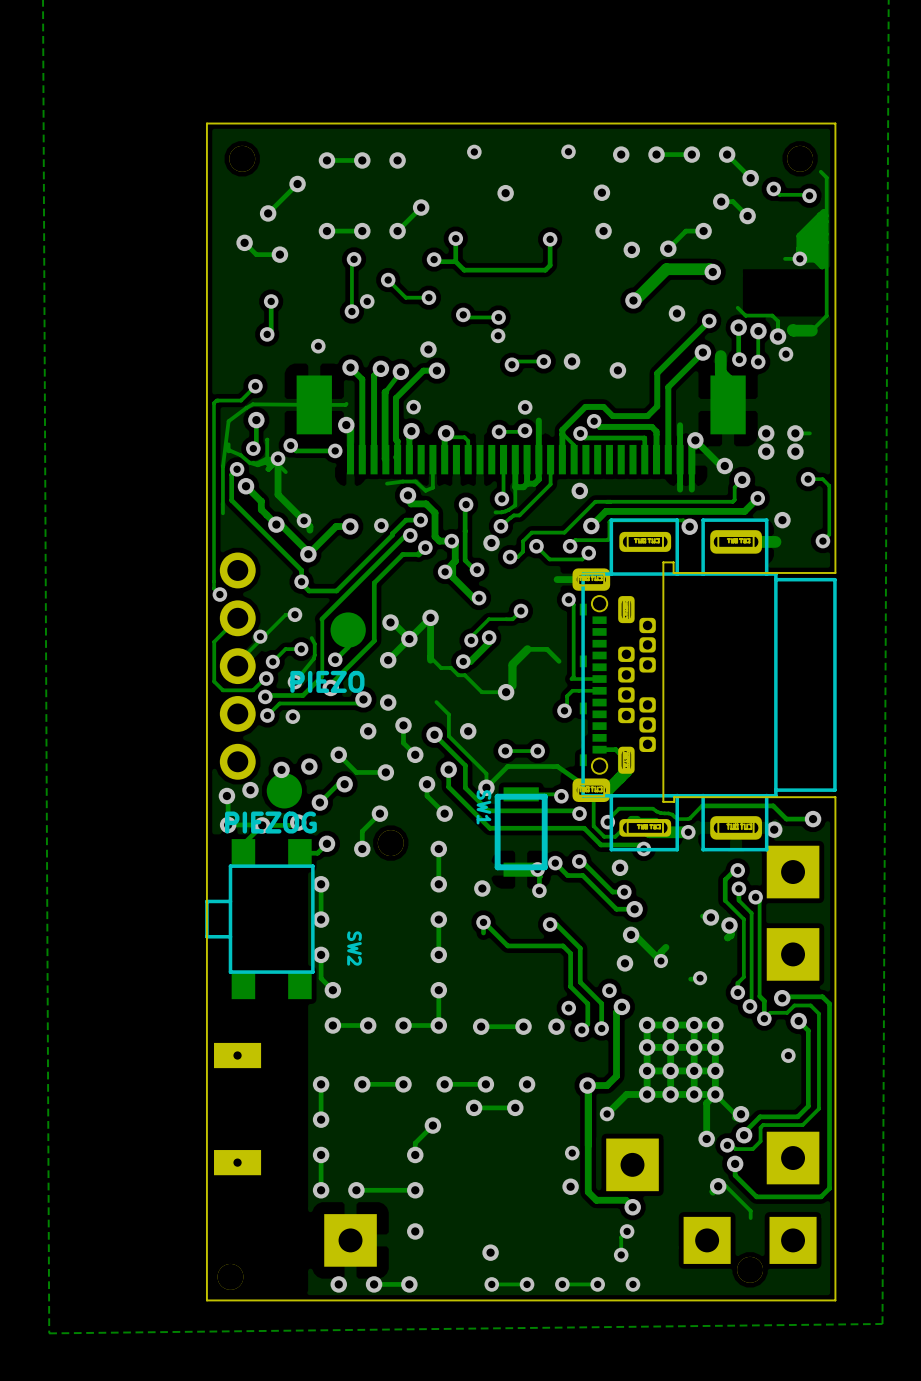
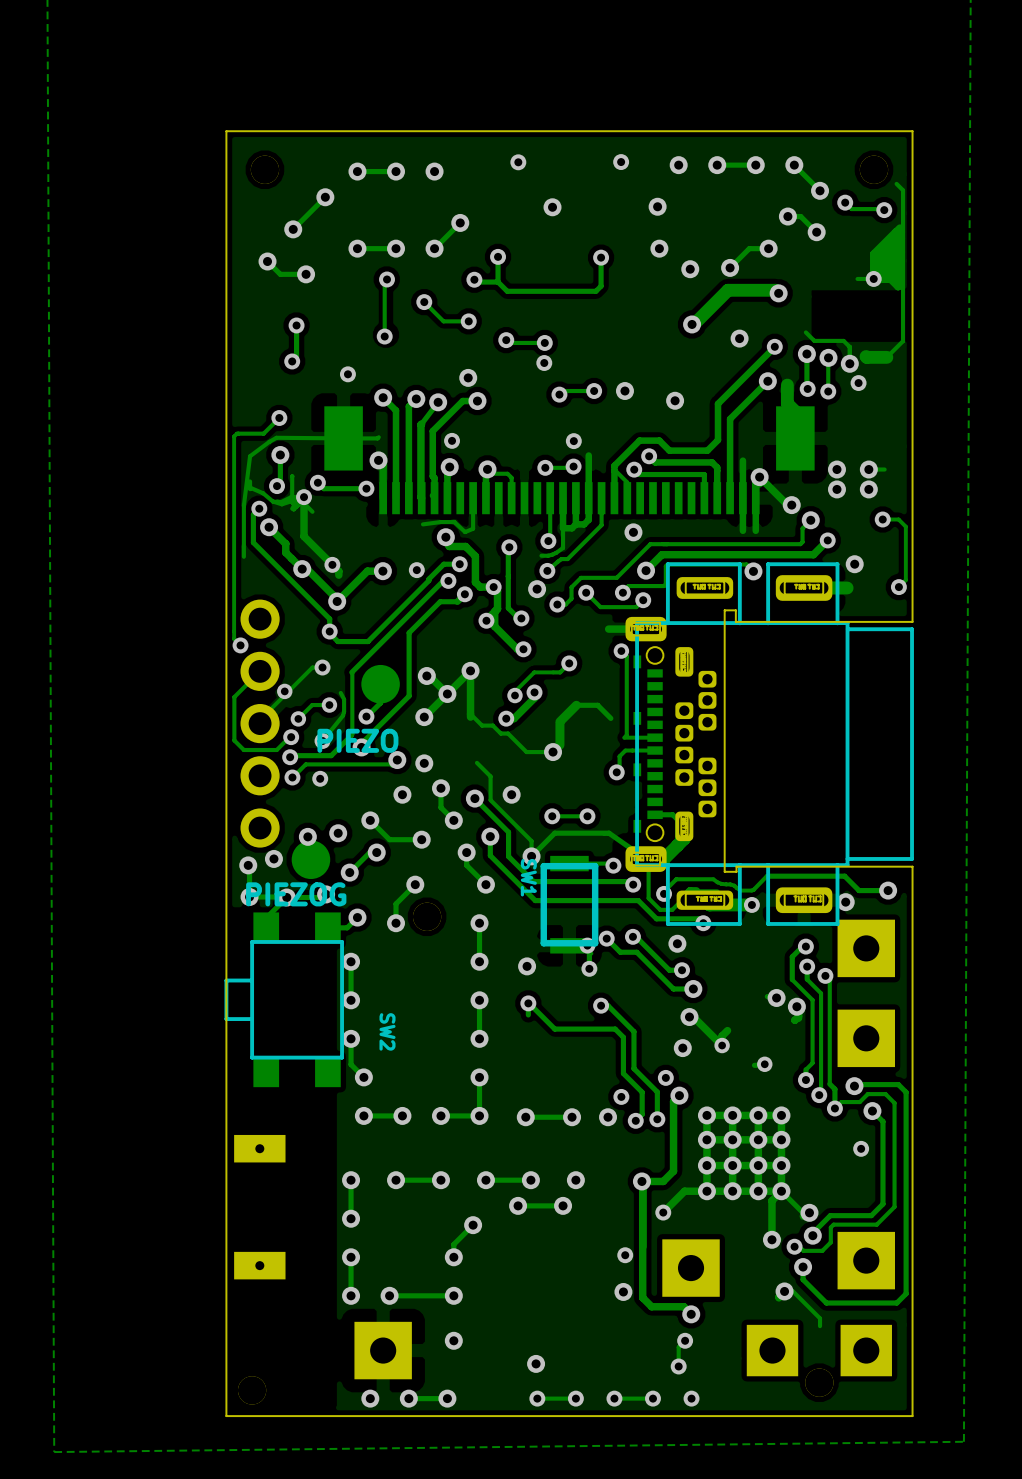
via: (367, 301) -> none

